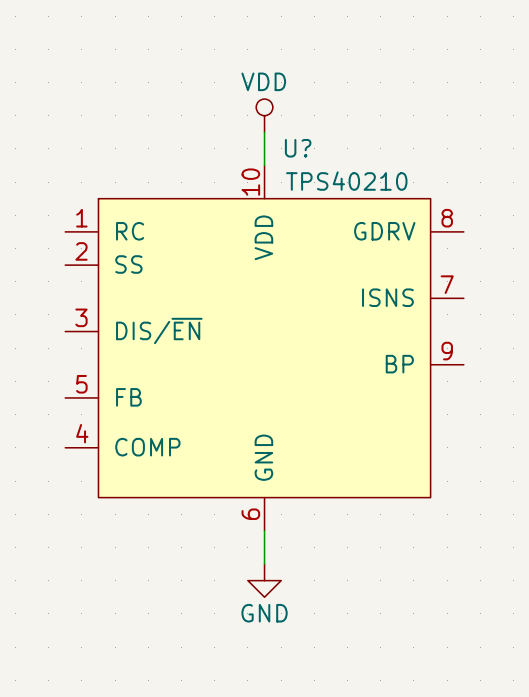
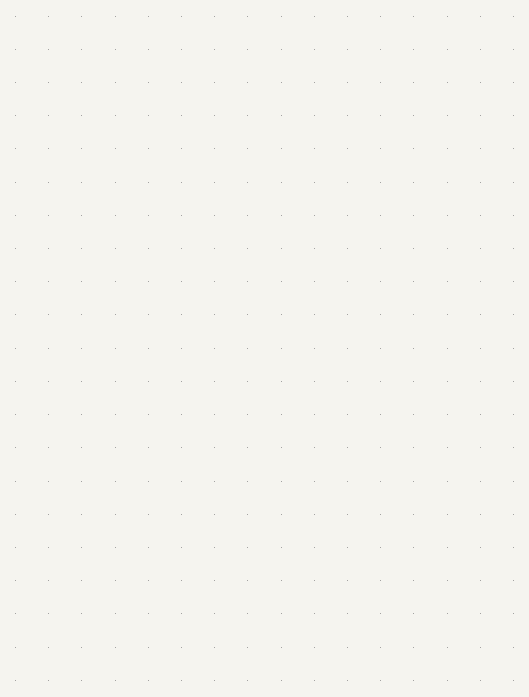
power symbol: VDD (264, 115) -> none
wire: (264, 132) (264, 165) -> none
U?: TPS40210 (264, 348) -> none
wire: (264, 530) (264, 564) -> none
power symbol: GND (264, 580) -> none

